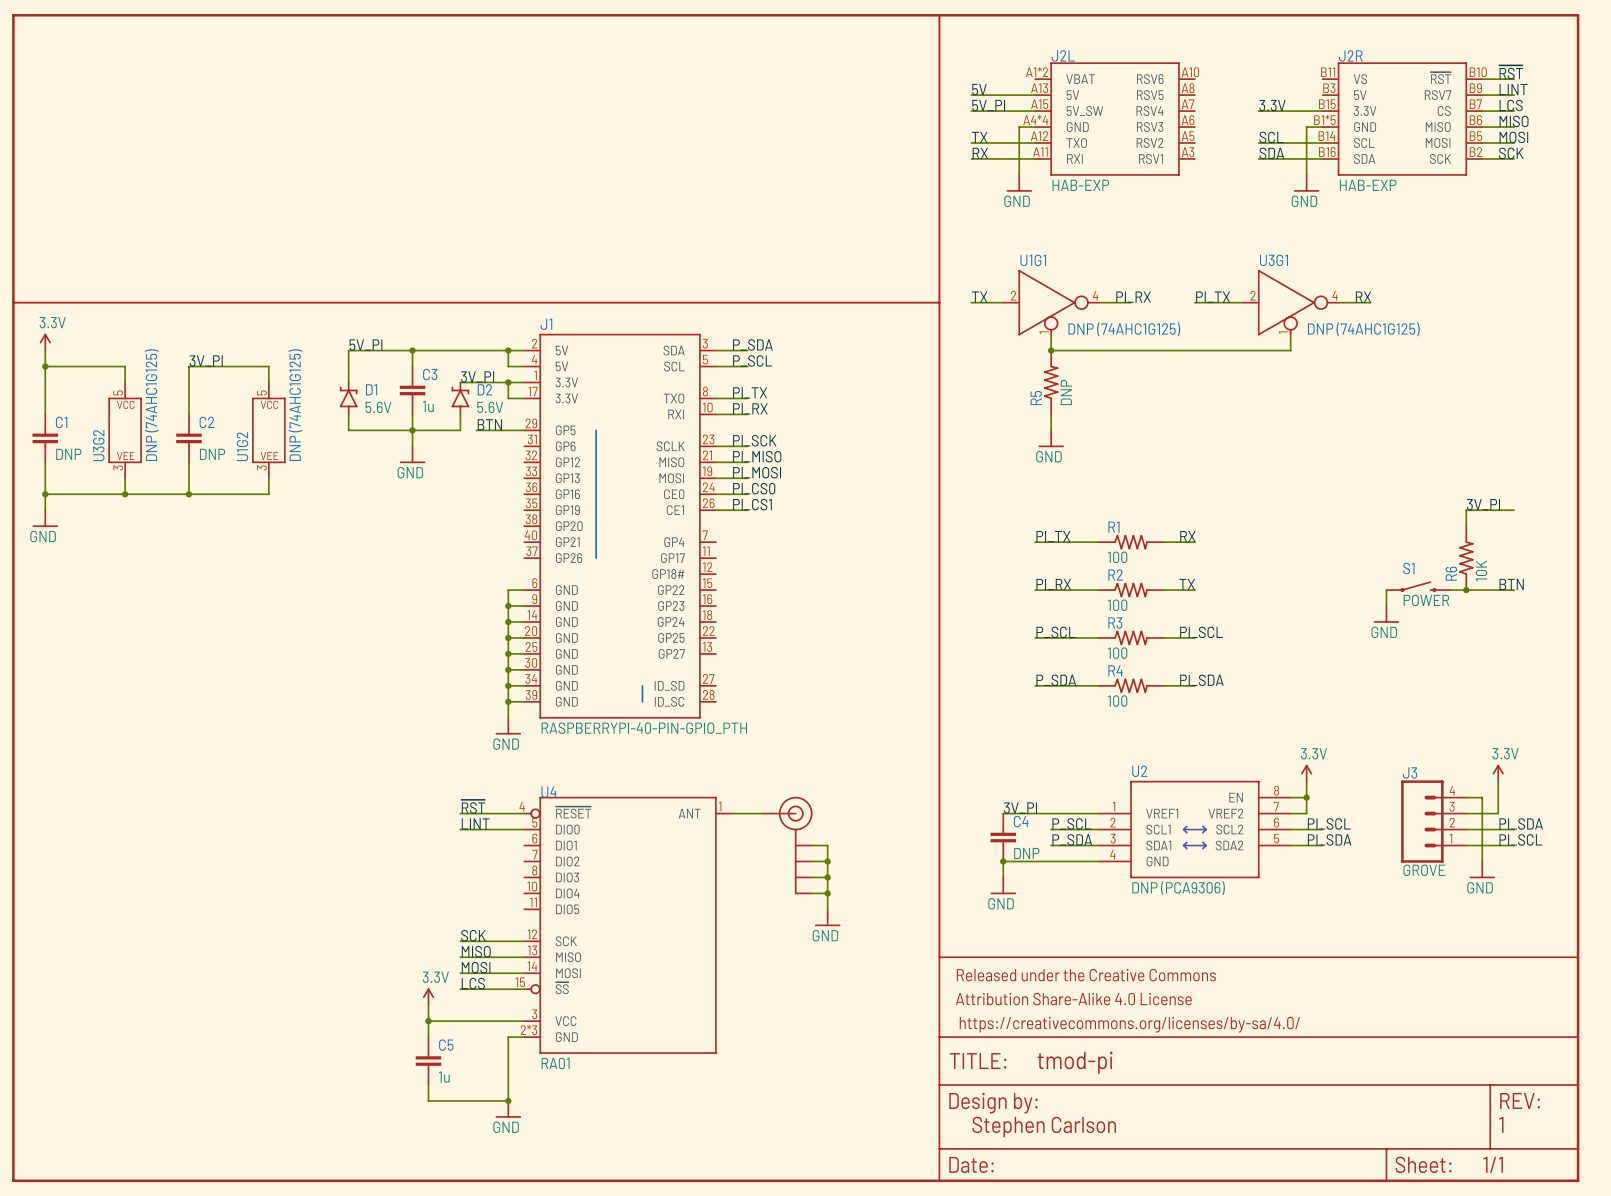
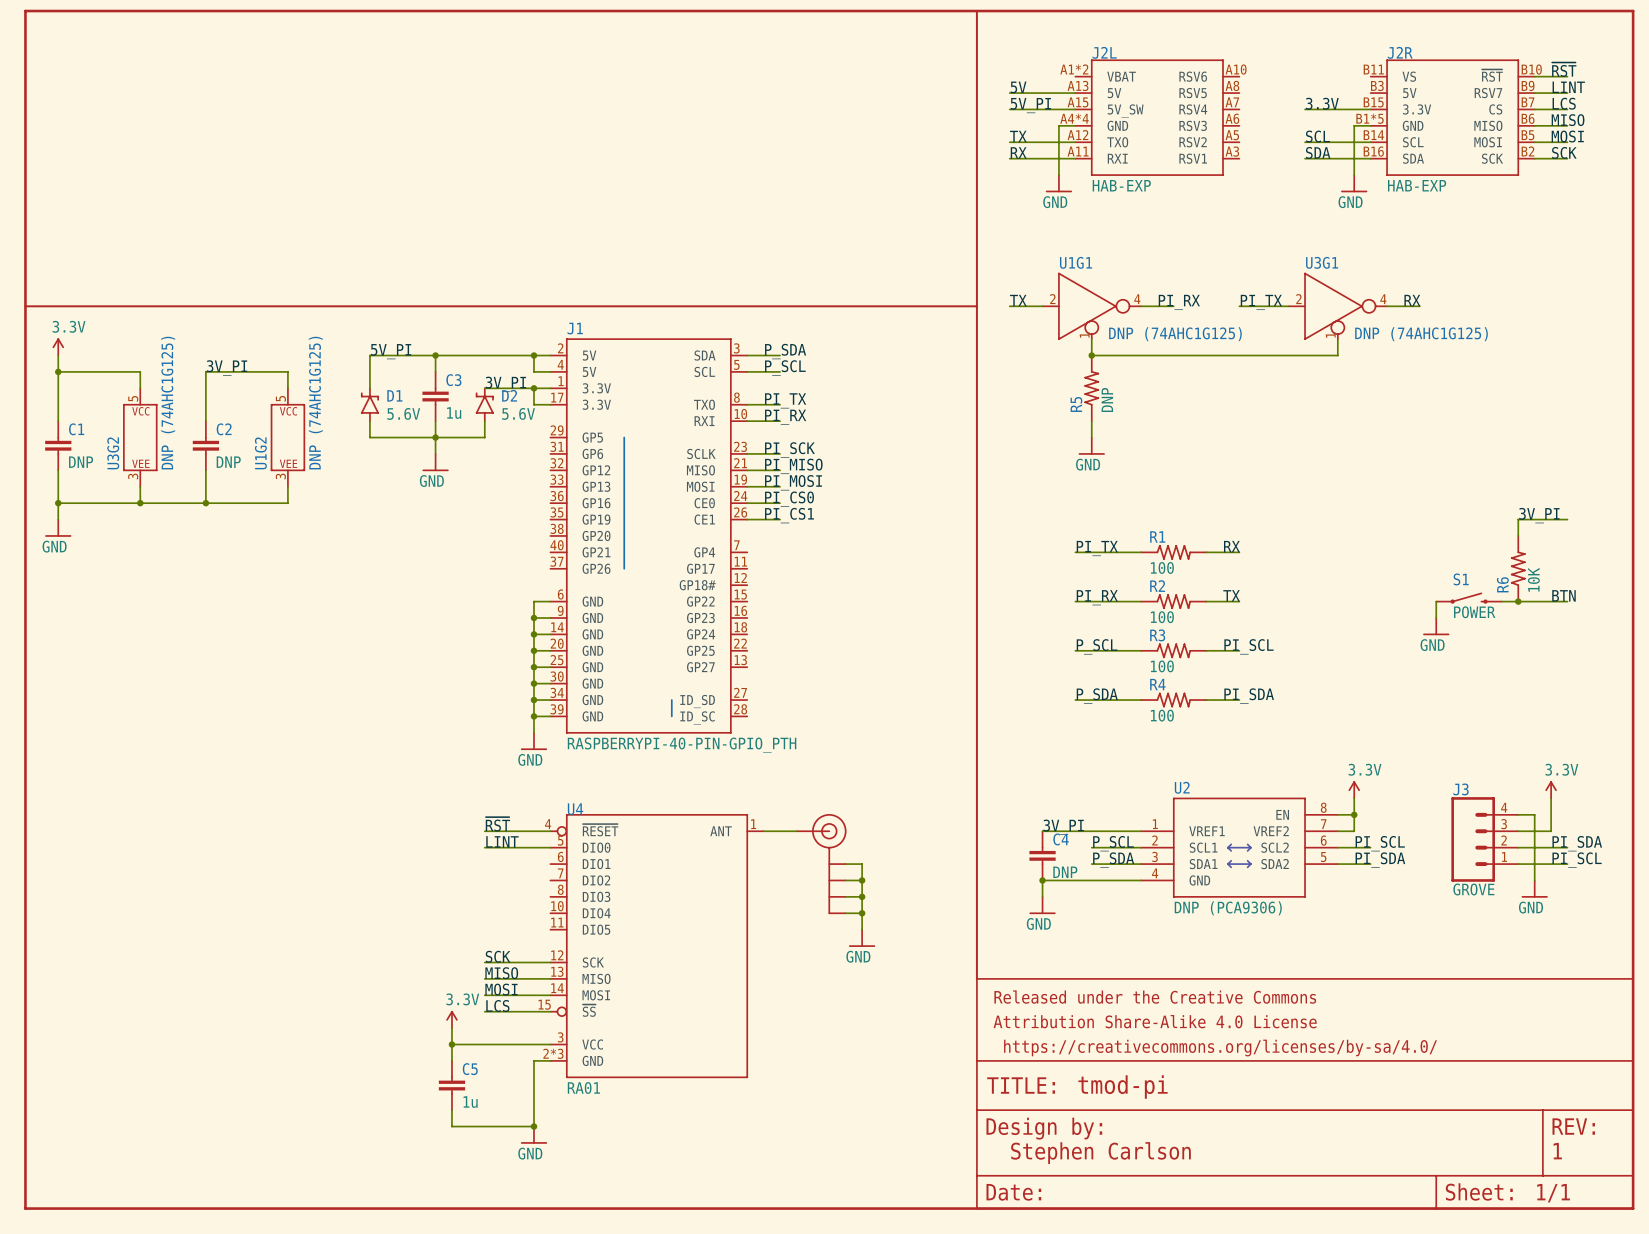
label: BTN (489, 424) -> none
wire: (476, 430) (524, 430) -> none

